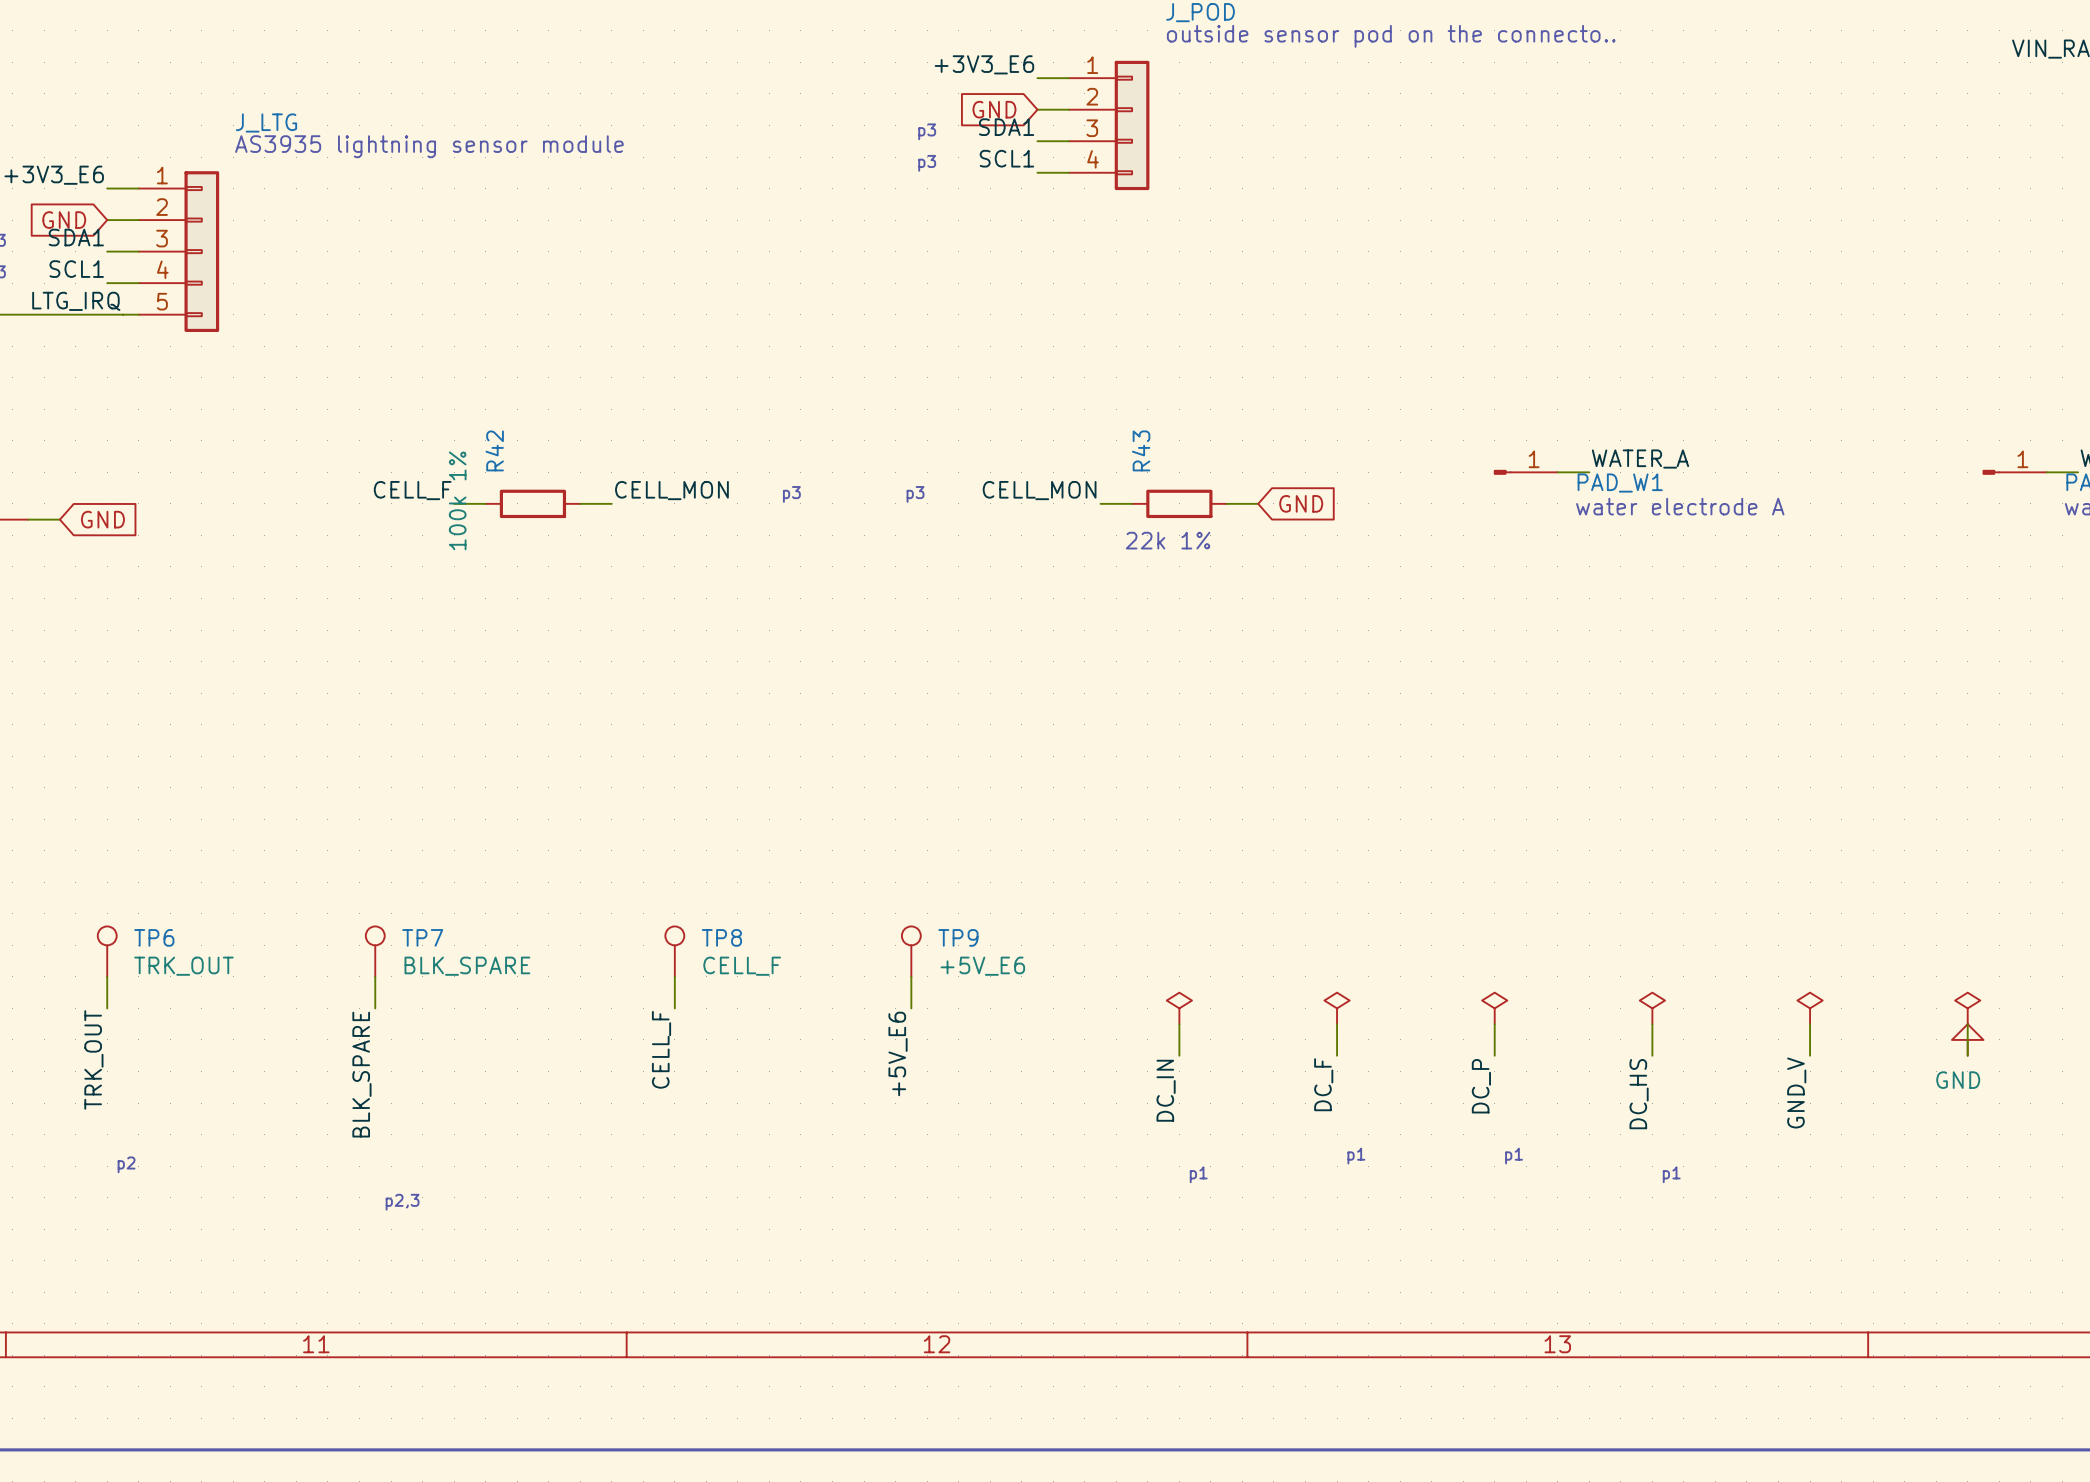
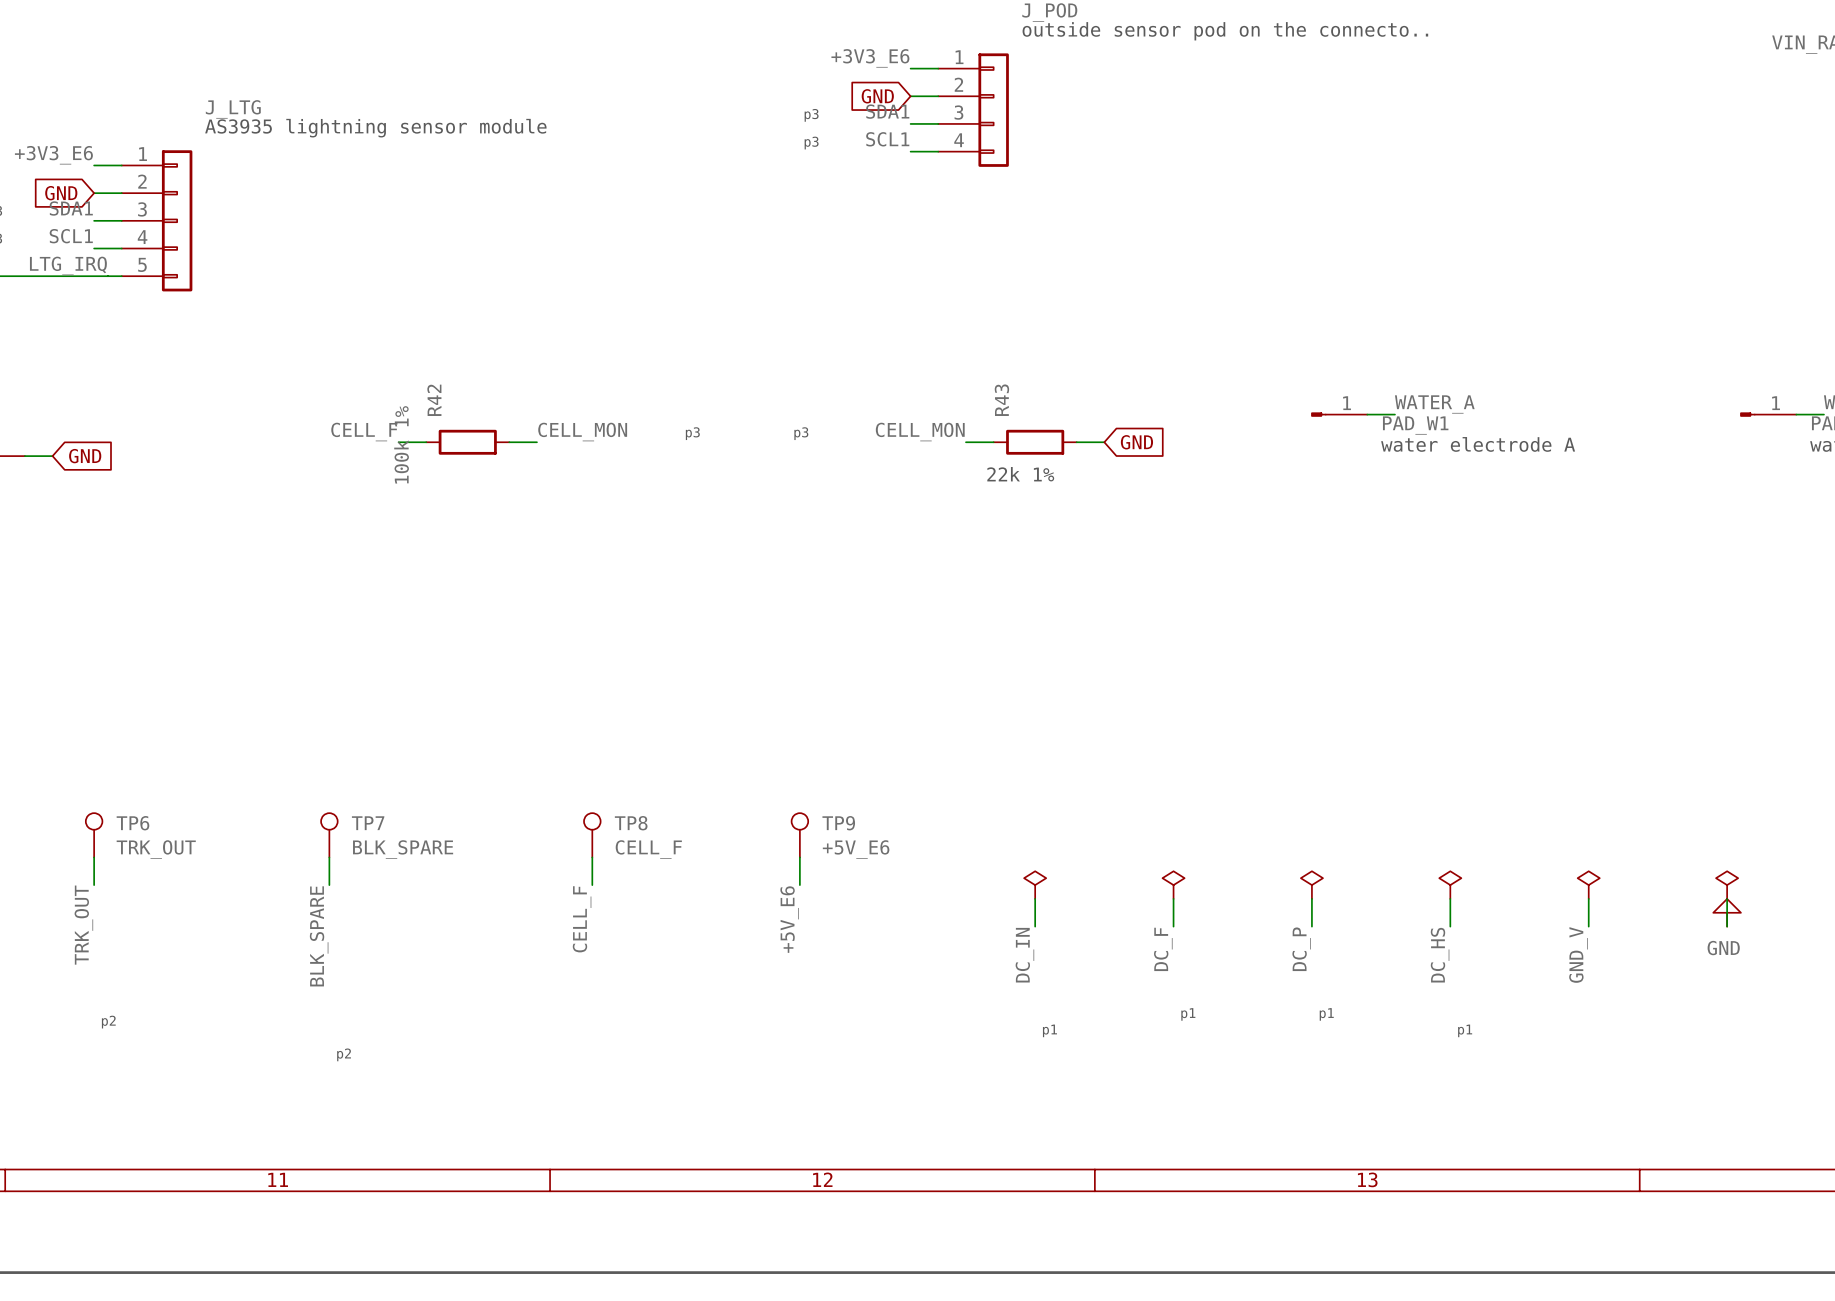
text: p2,3 (402, 1202) -> p2 (344, 1054)

